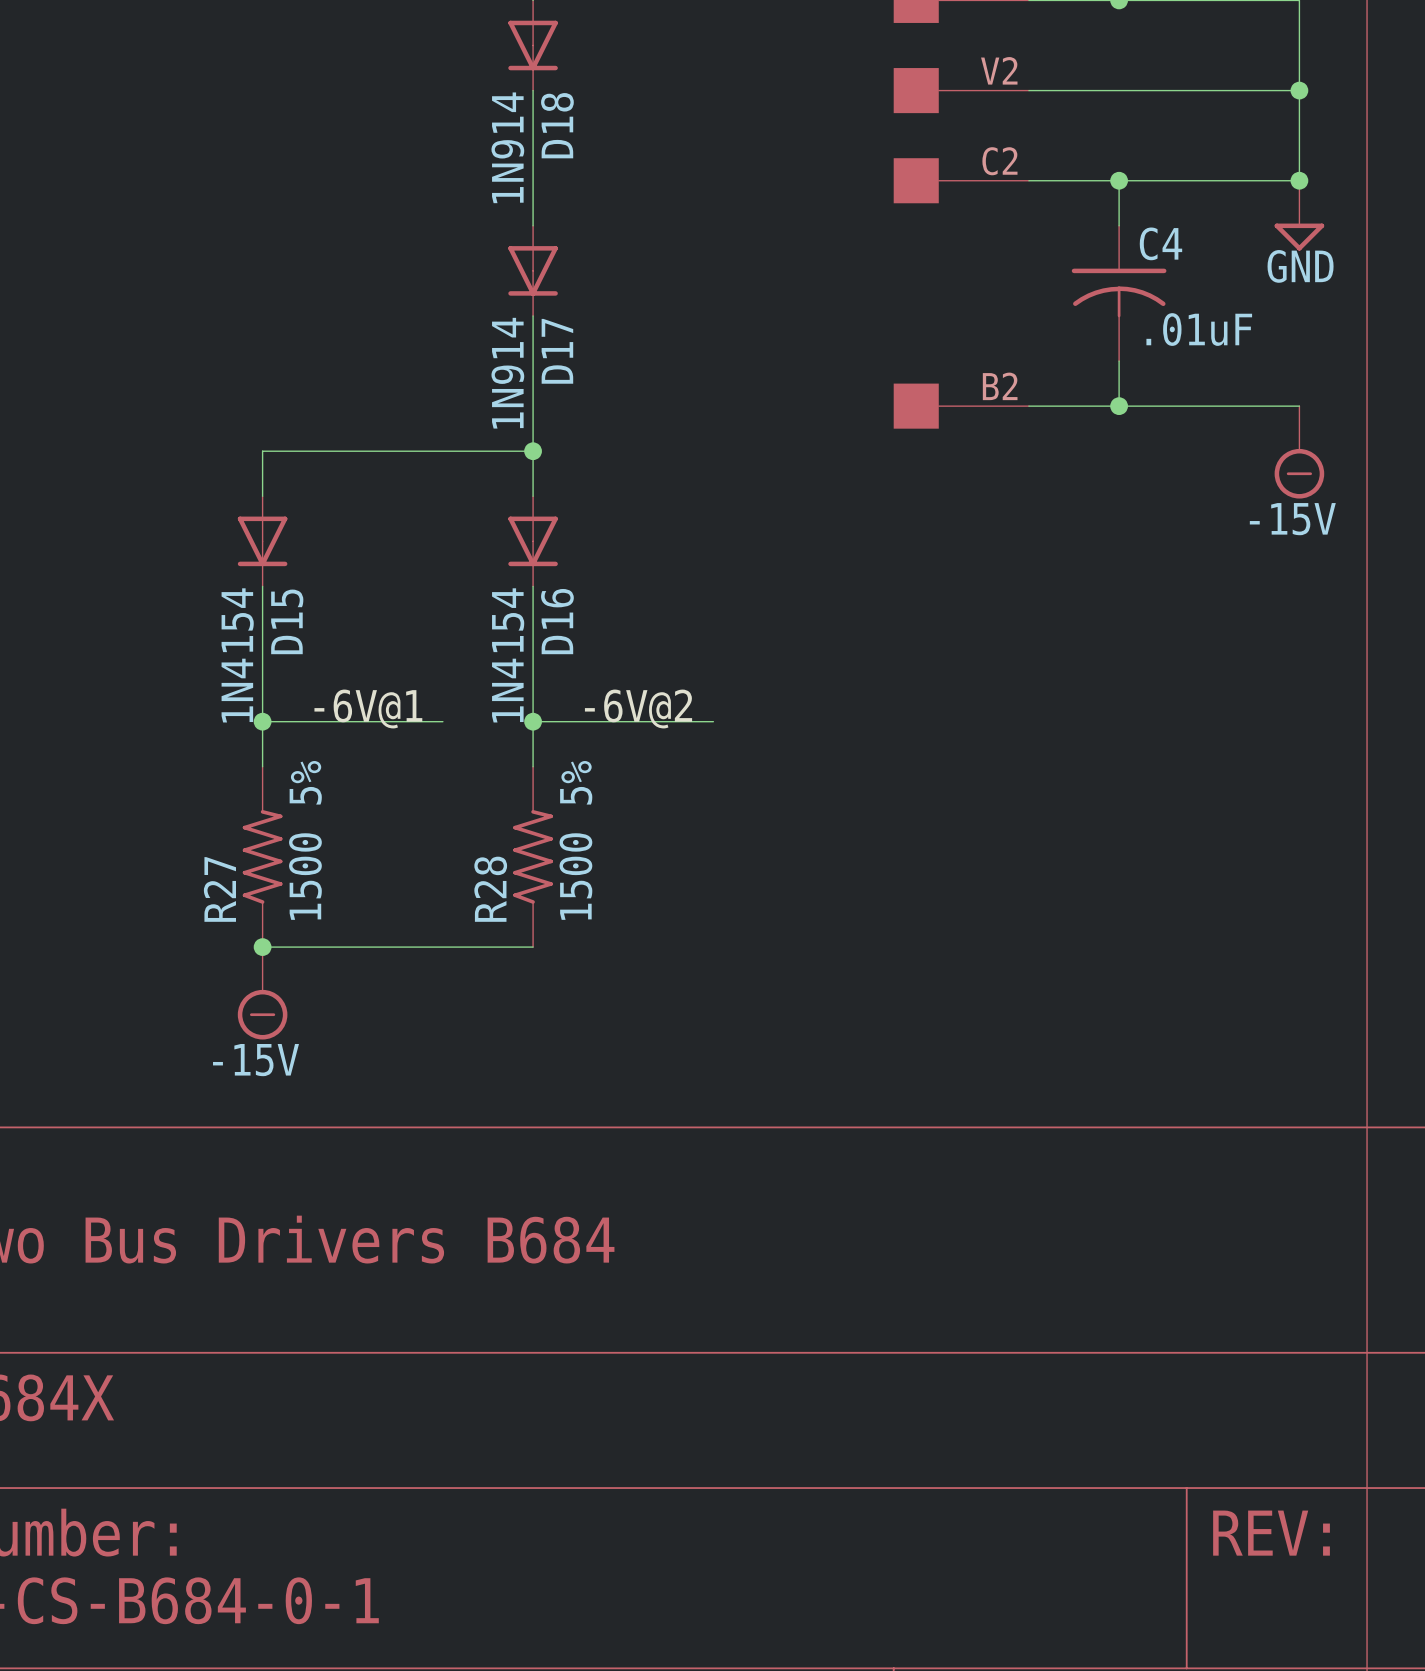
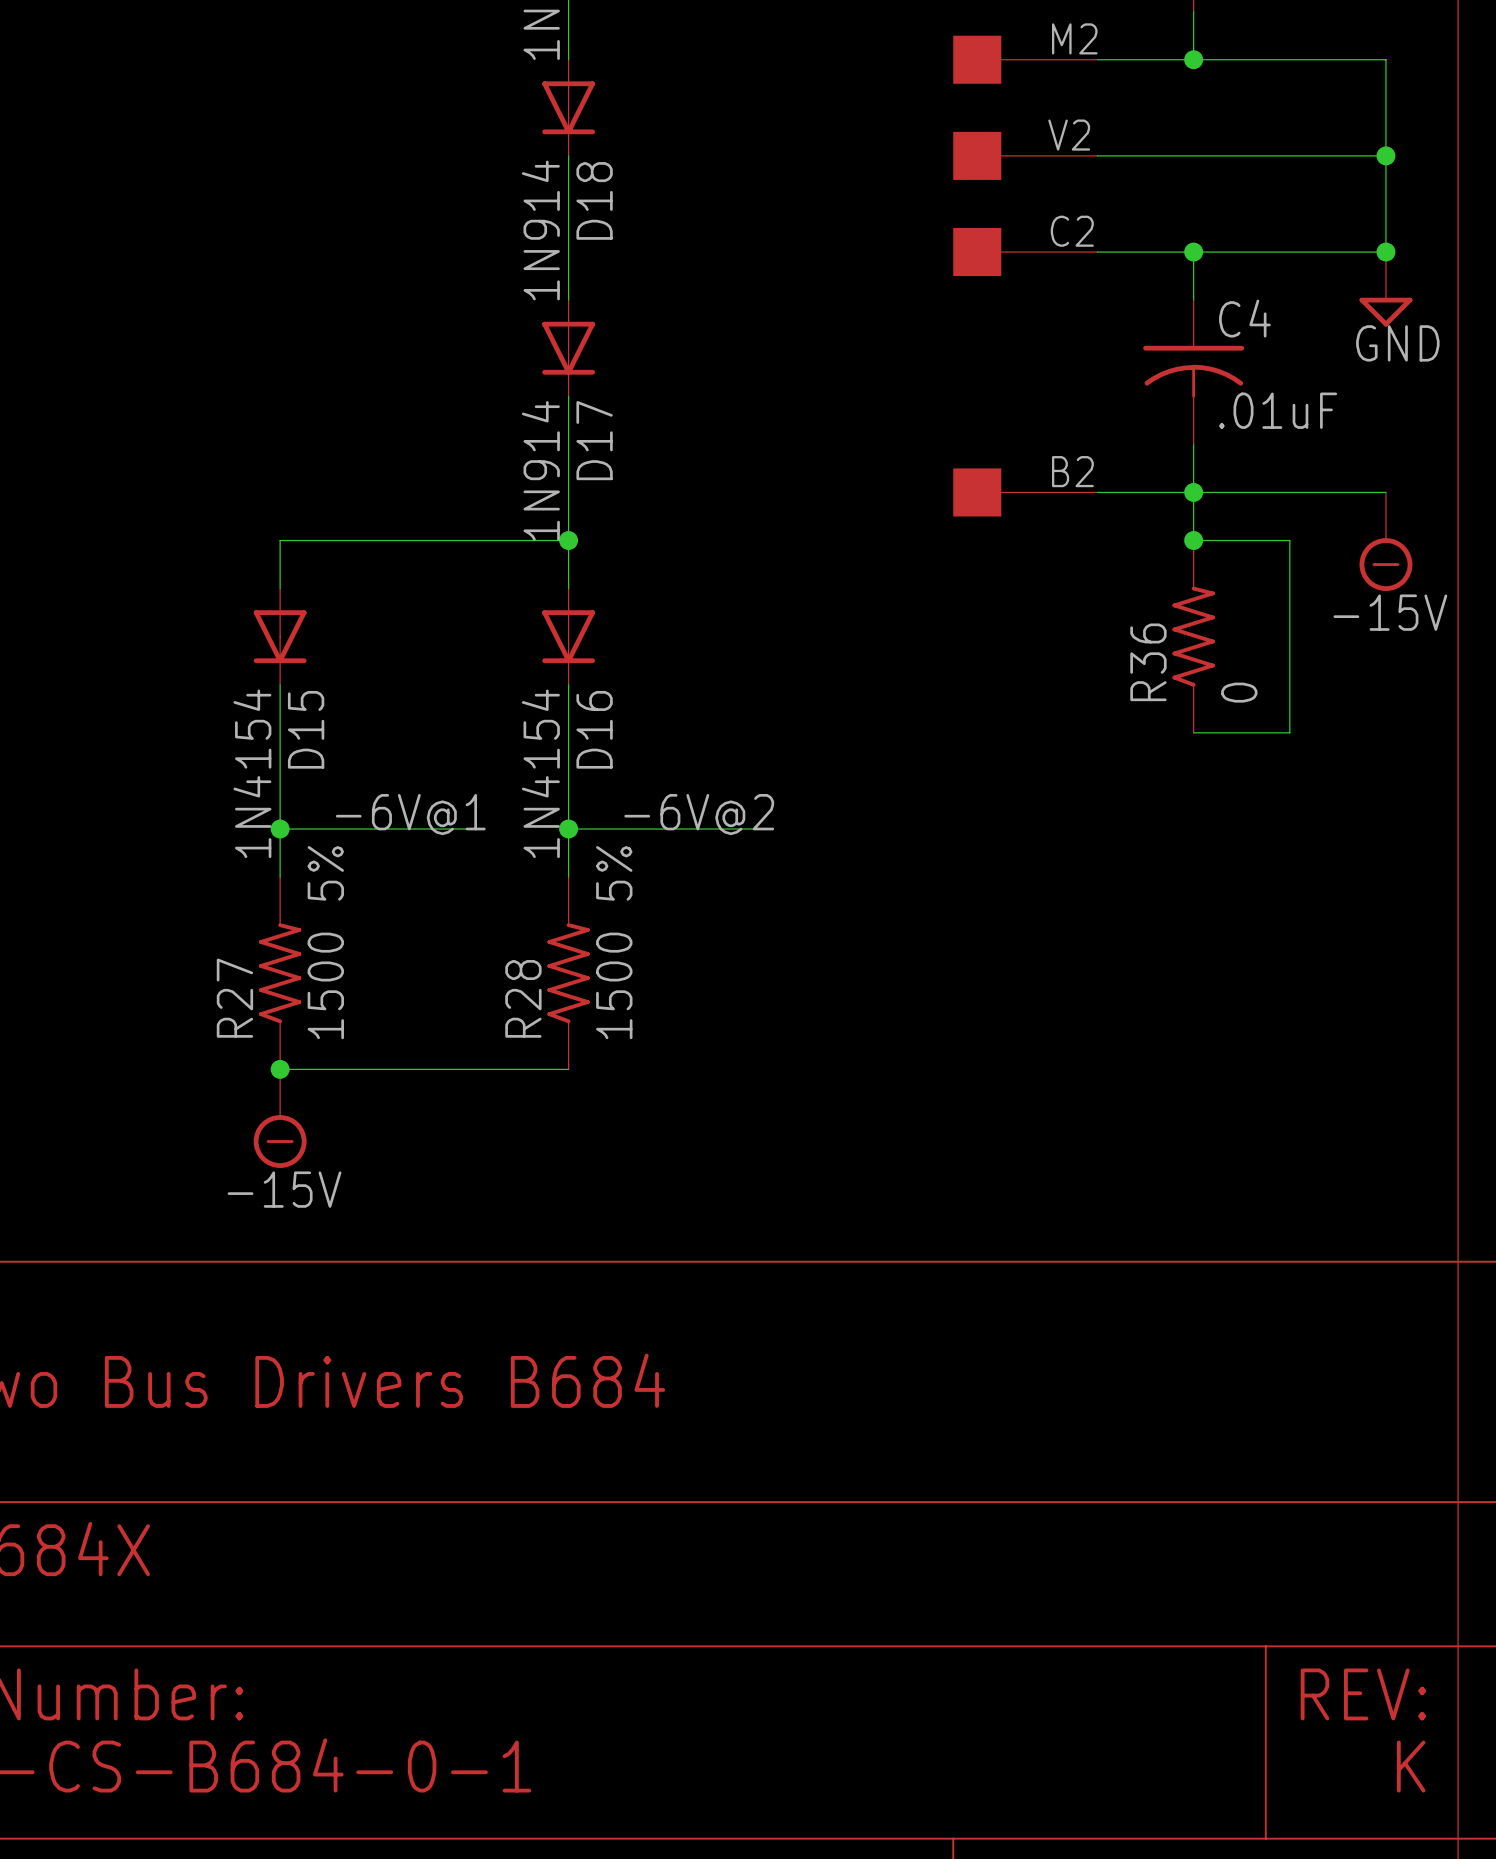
wire: none -> (1193, 492) (1193, 540) (1289, 540) (1289, 732) (1193, 732)
junction: none -> (1193, 540)
R36: none -> 0 (1193, 636)
text: none -> K (1411, 1766)

